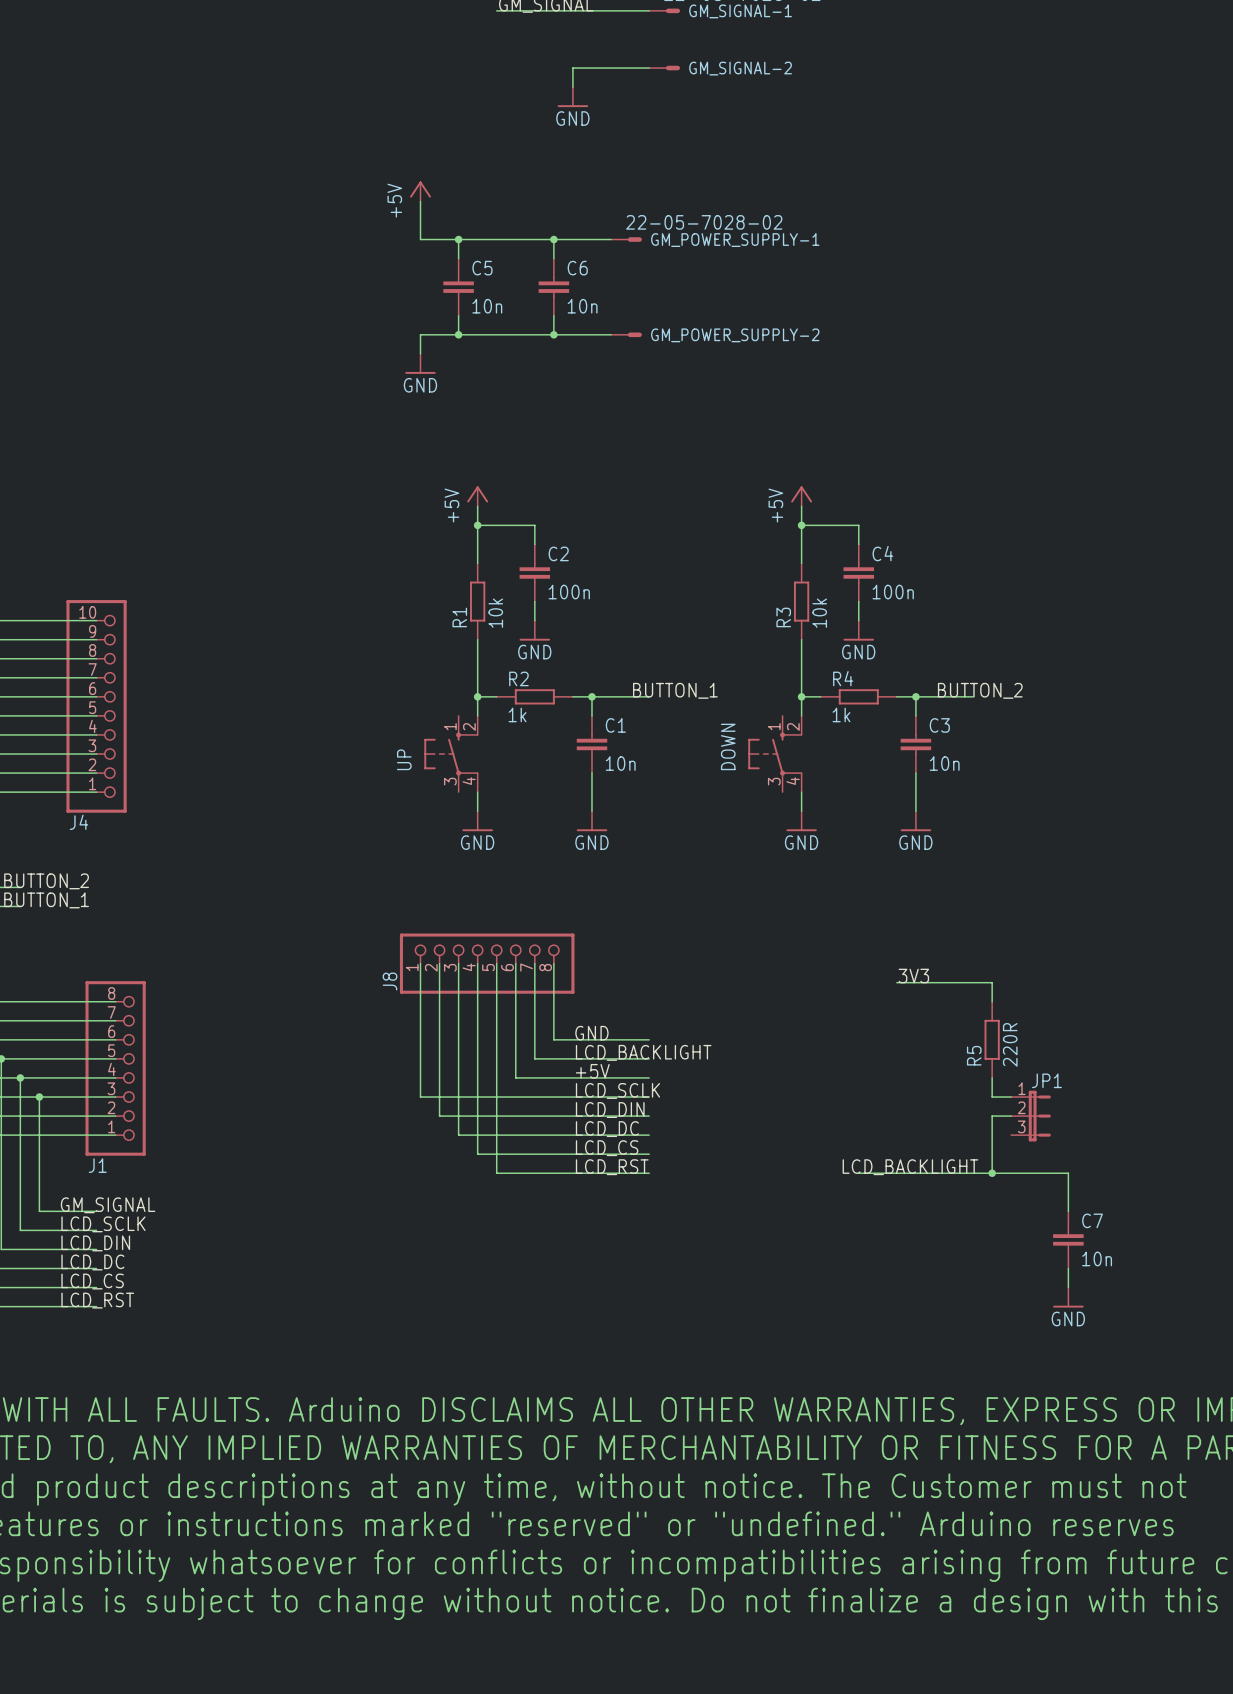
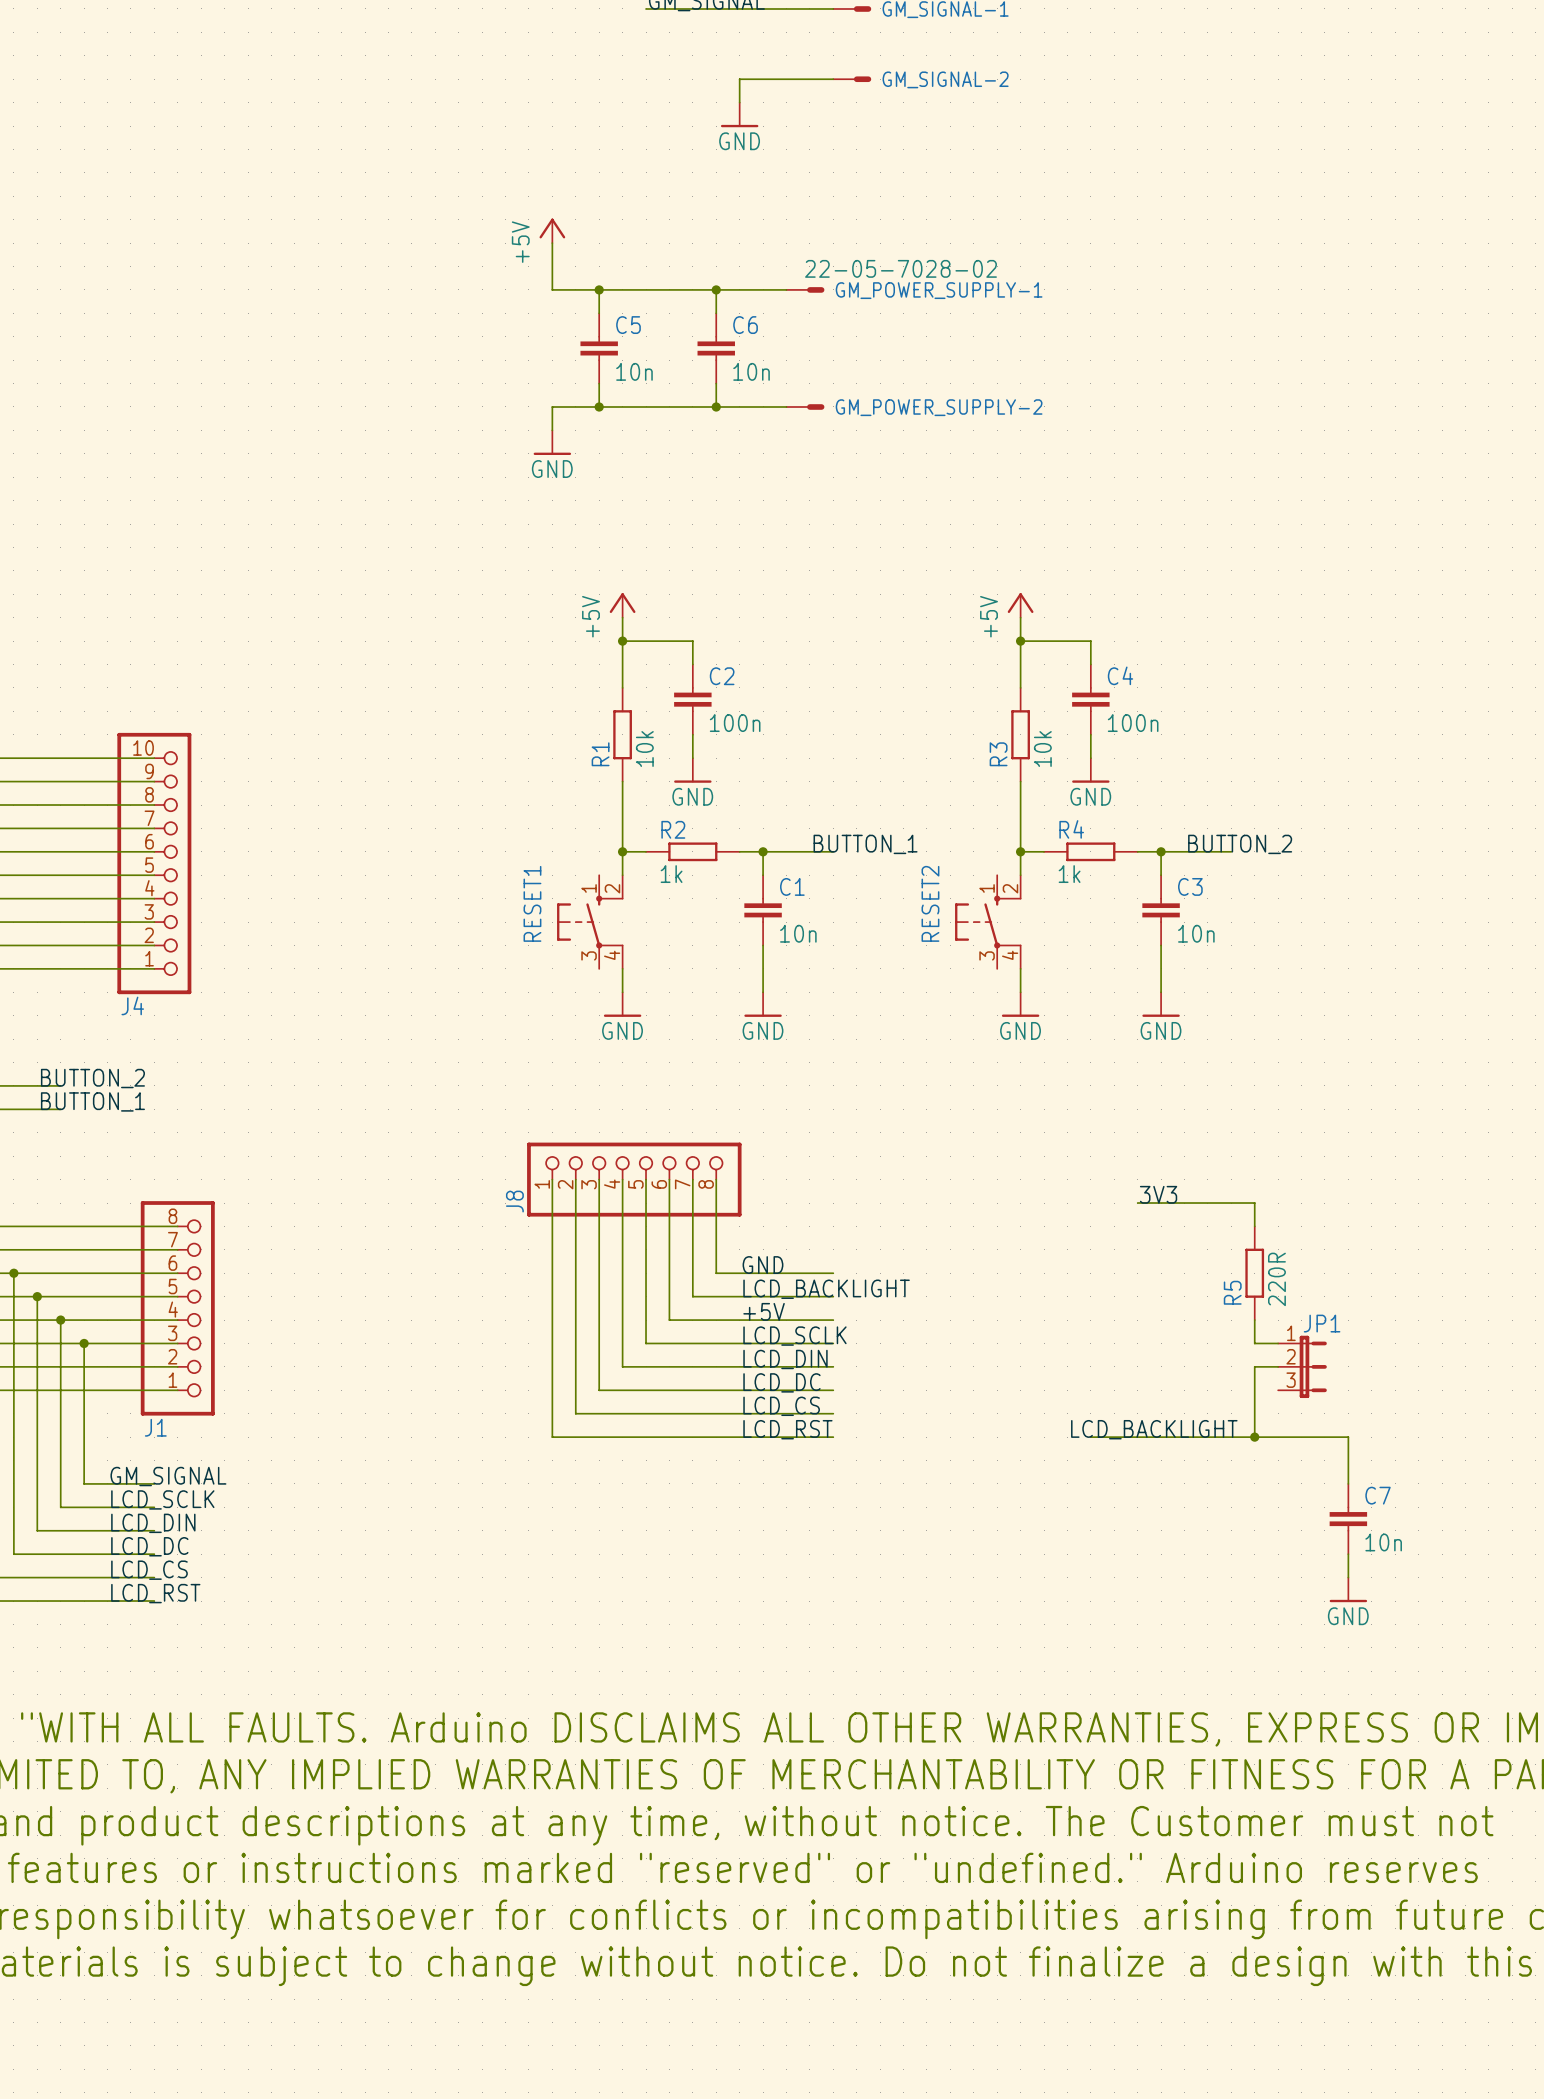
DOWN name: DOWN (728, 746) -> RESET2 (930, 903)
UP name: UP (404, 759) -> RESET1 (532, 903)
wire: (420, 1097) (496, 1097) (496, 1173) -> (552, 1343) (552, 1437) (646, 1437)
wire: (439, 1116) (477, 1116) (477, 1154) -> (575, 1366) (575, 1413) (622, 1413)

